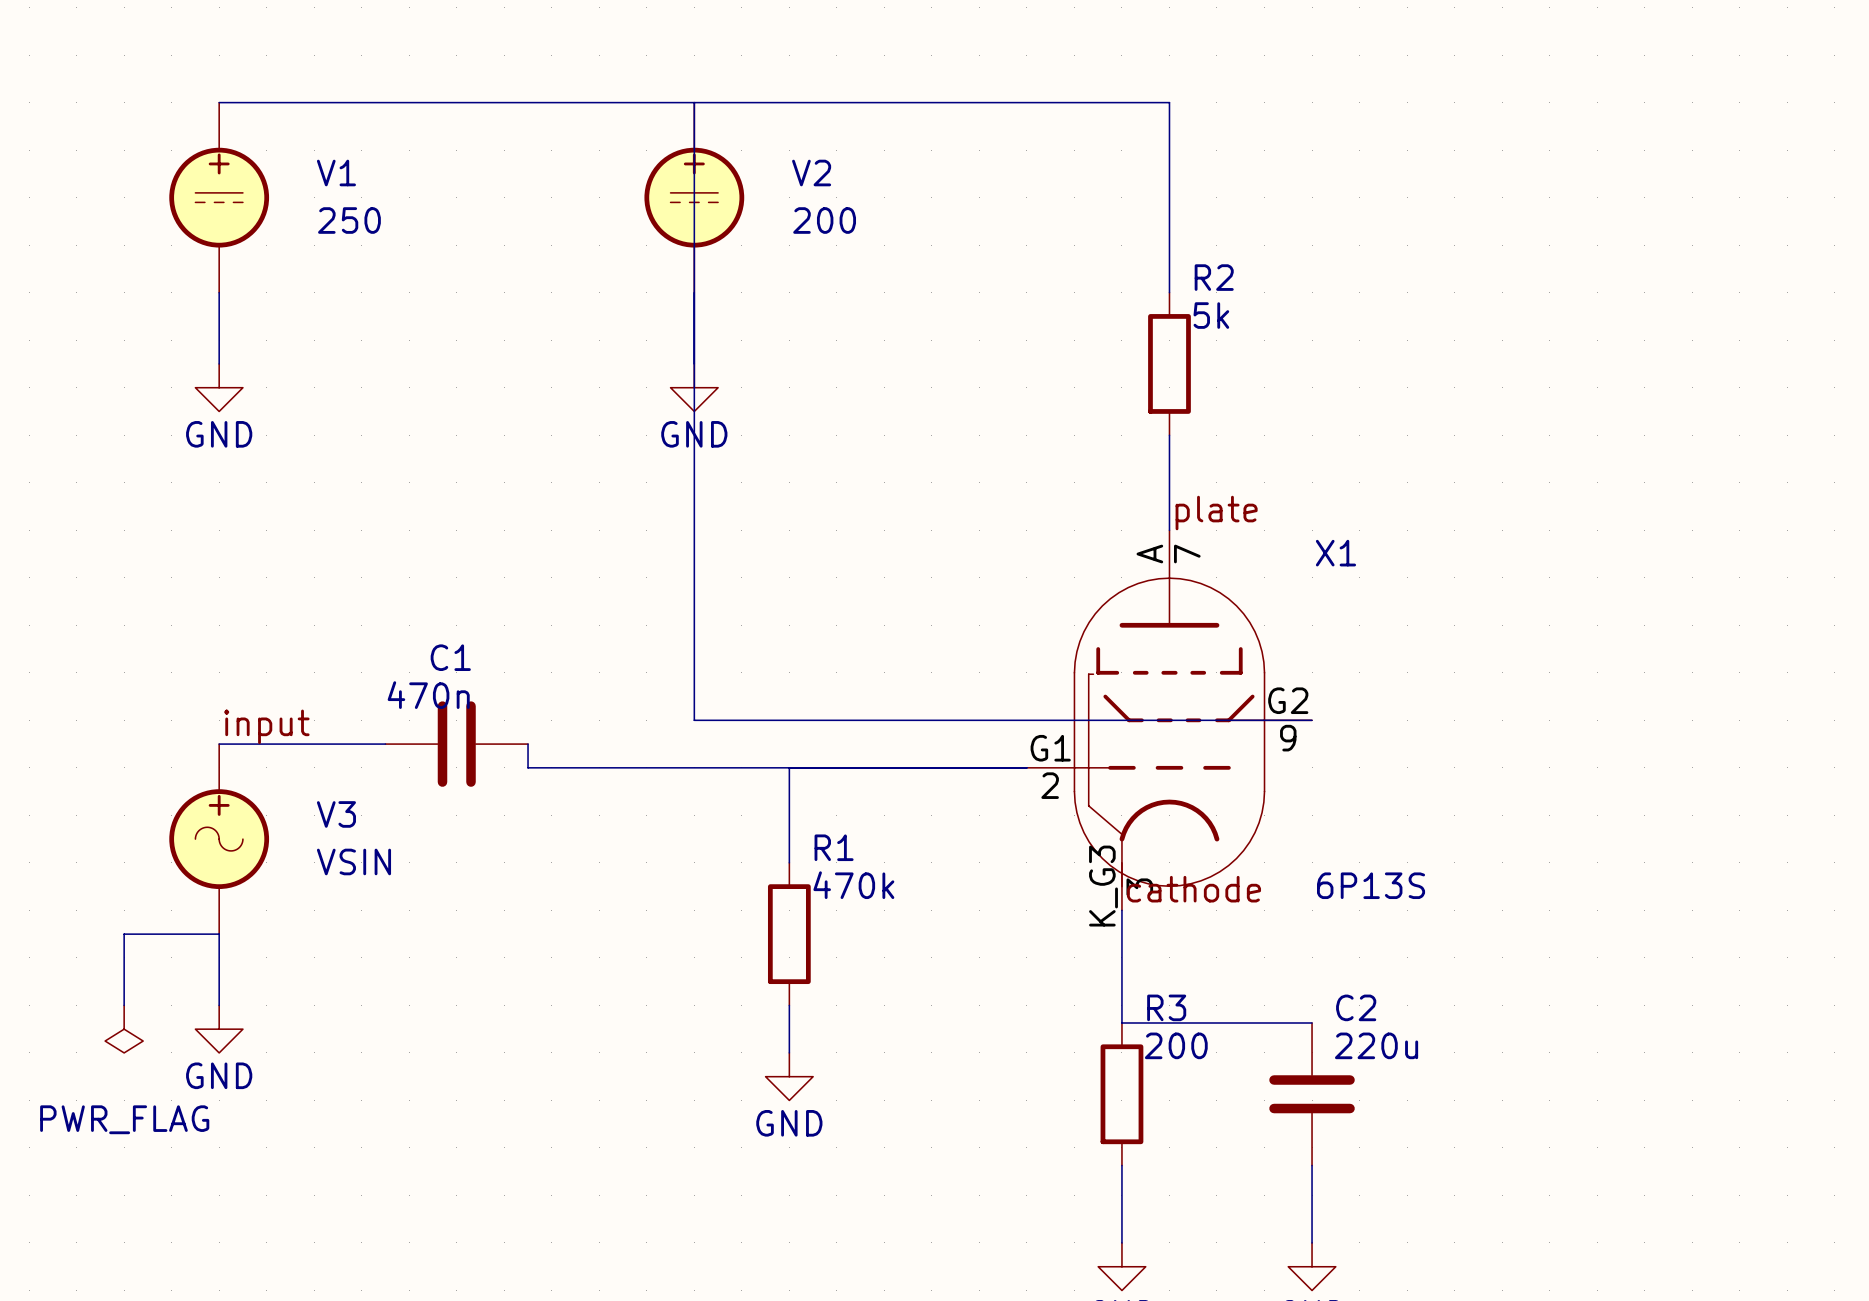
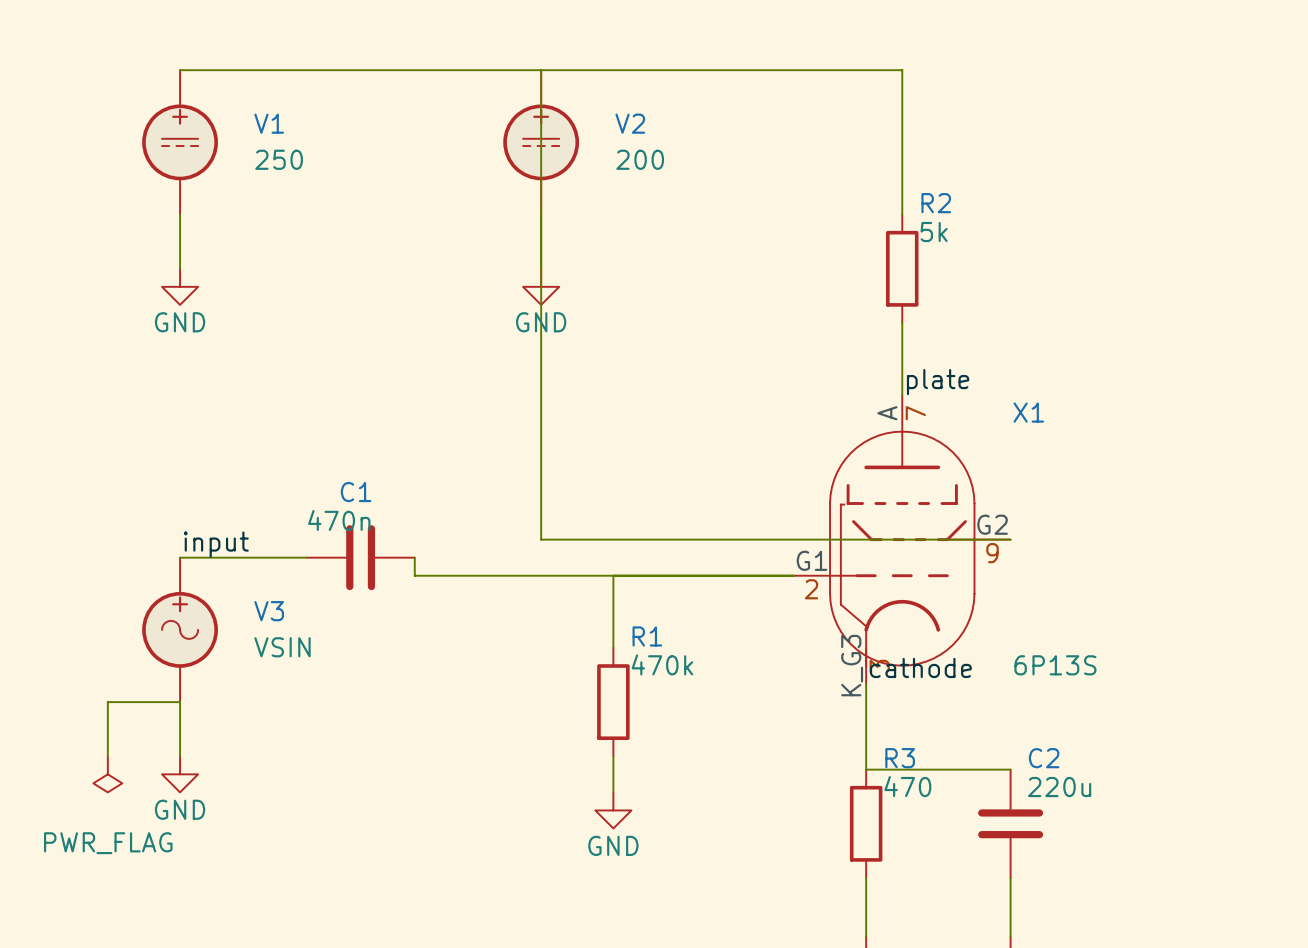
R3 value: 200 (1176, 1045) -> 470 (907, 786)

